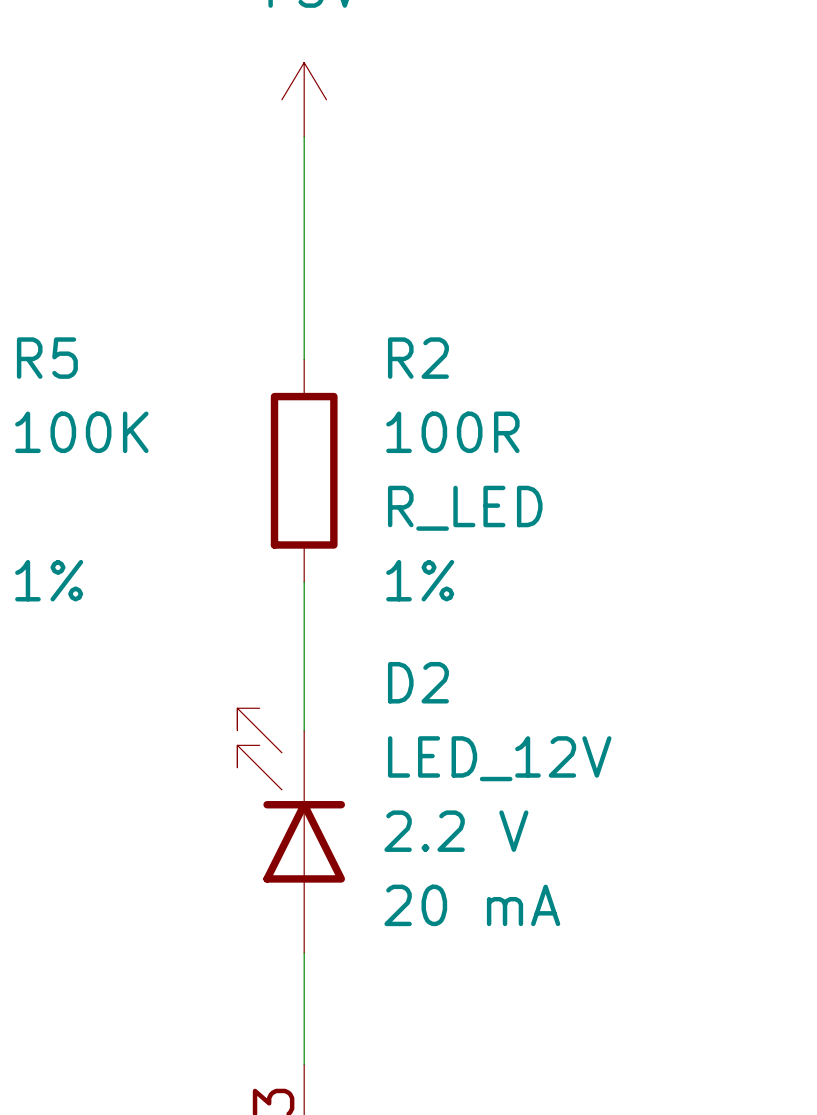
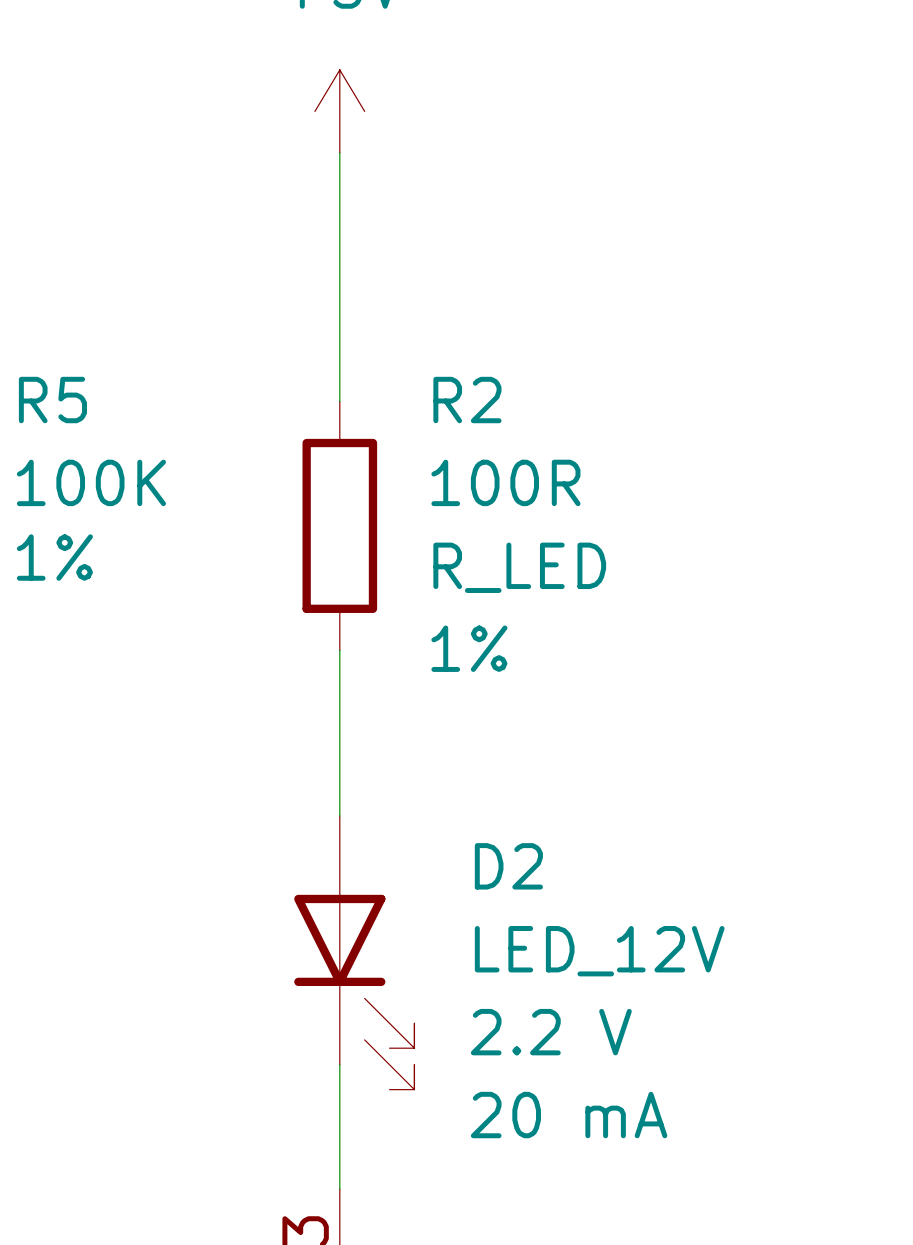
R5 text position: 1% (49, 580) -> 1% (54, 557)
D2 name position: D2 (418, 682) -> D2 (508, 866)
D2 text position: LED_12V (499, 758) -> LED_12V (599, 951)
D2 rotation: 0° (291, 795) -> 180° (354, 992)
D2 text position: 2.2 V (456, 831) -> 2.2 V (551, 1032)
D2 text position: 20 mA (472, 905) -> 20 mA (569, 1115)

